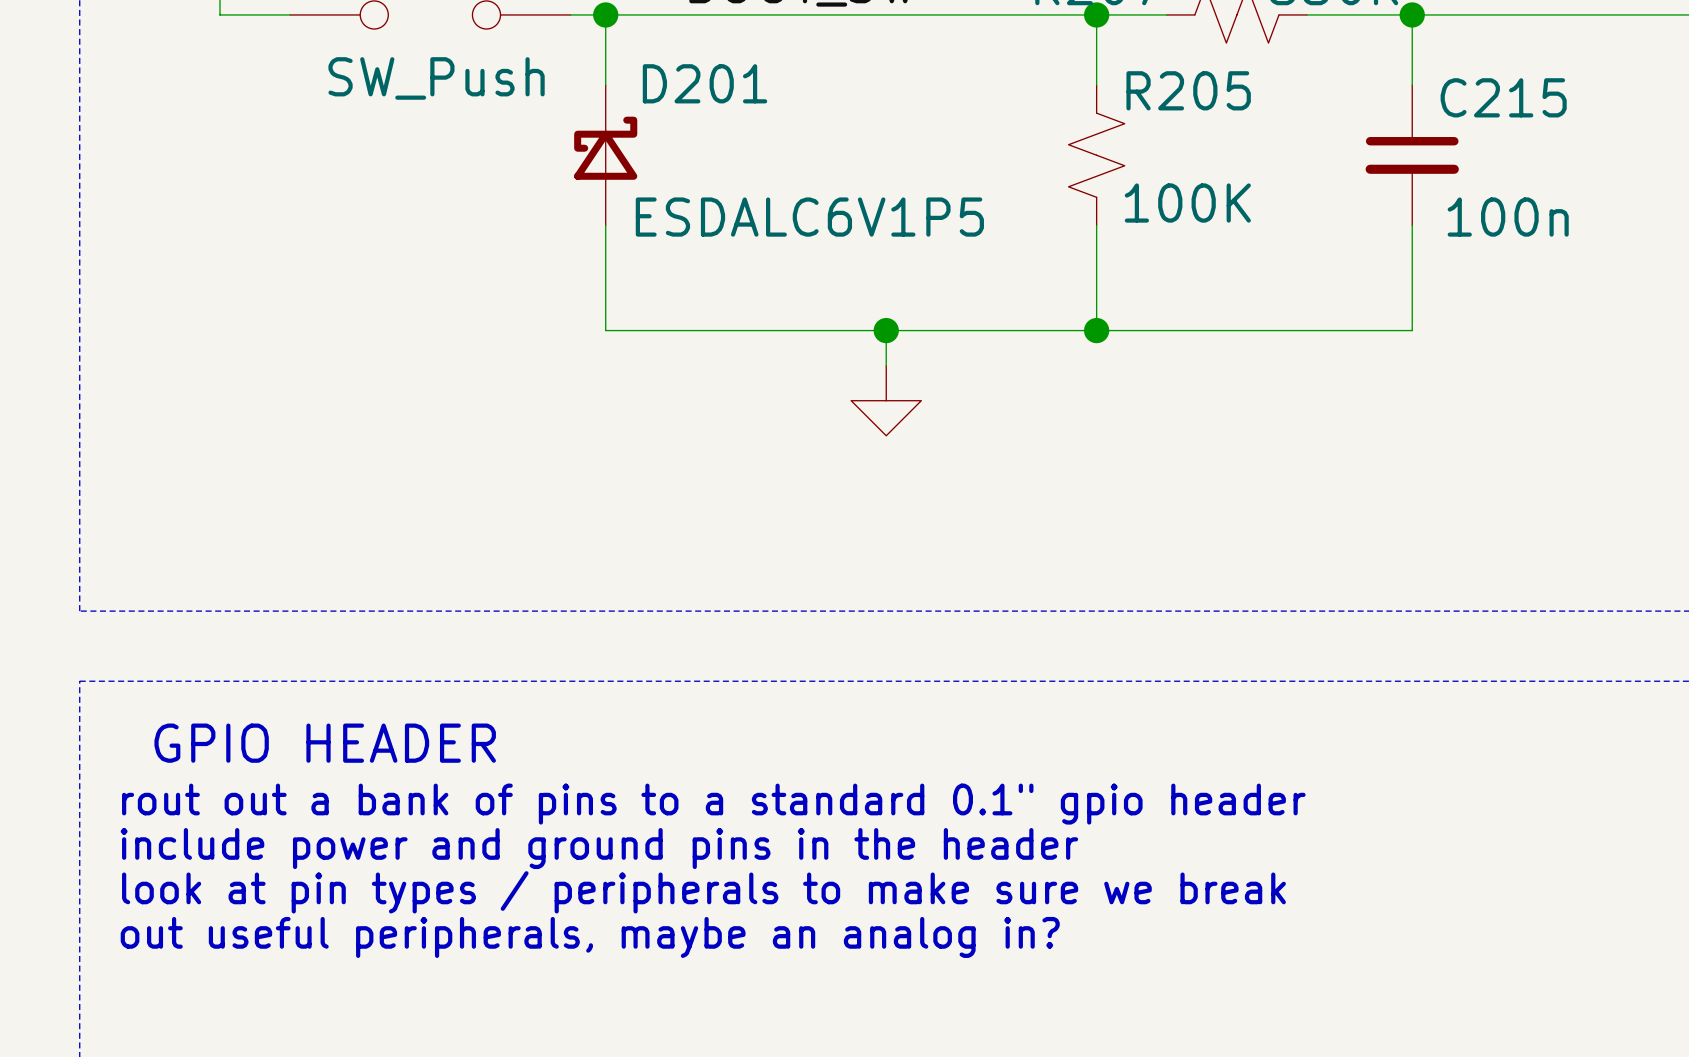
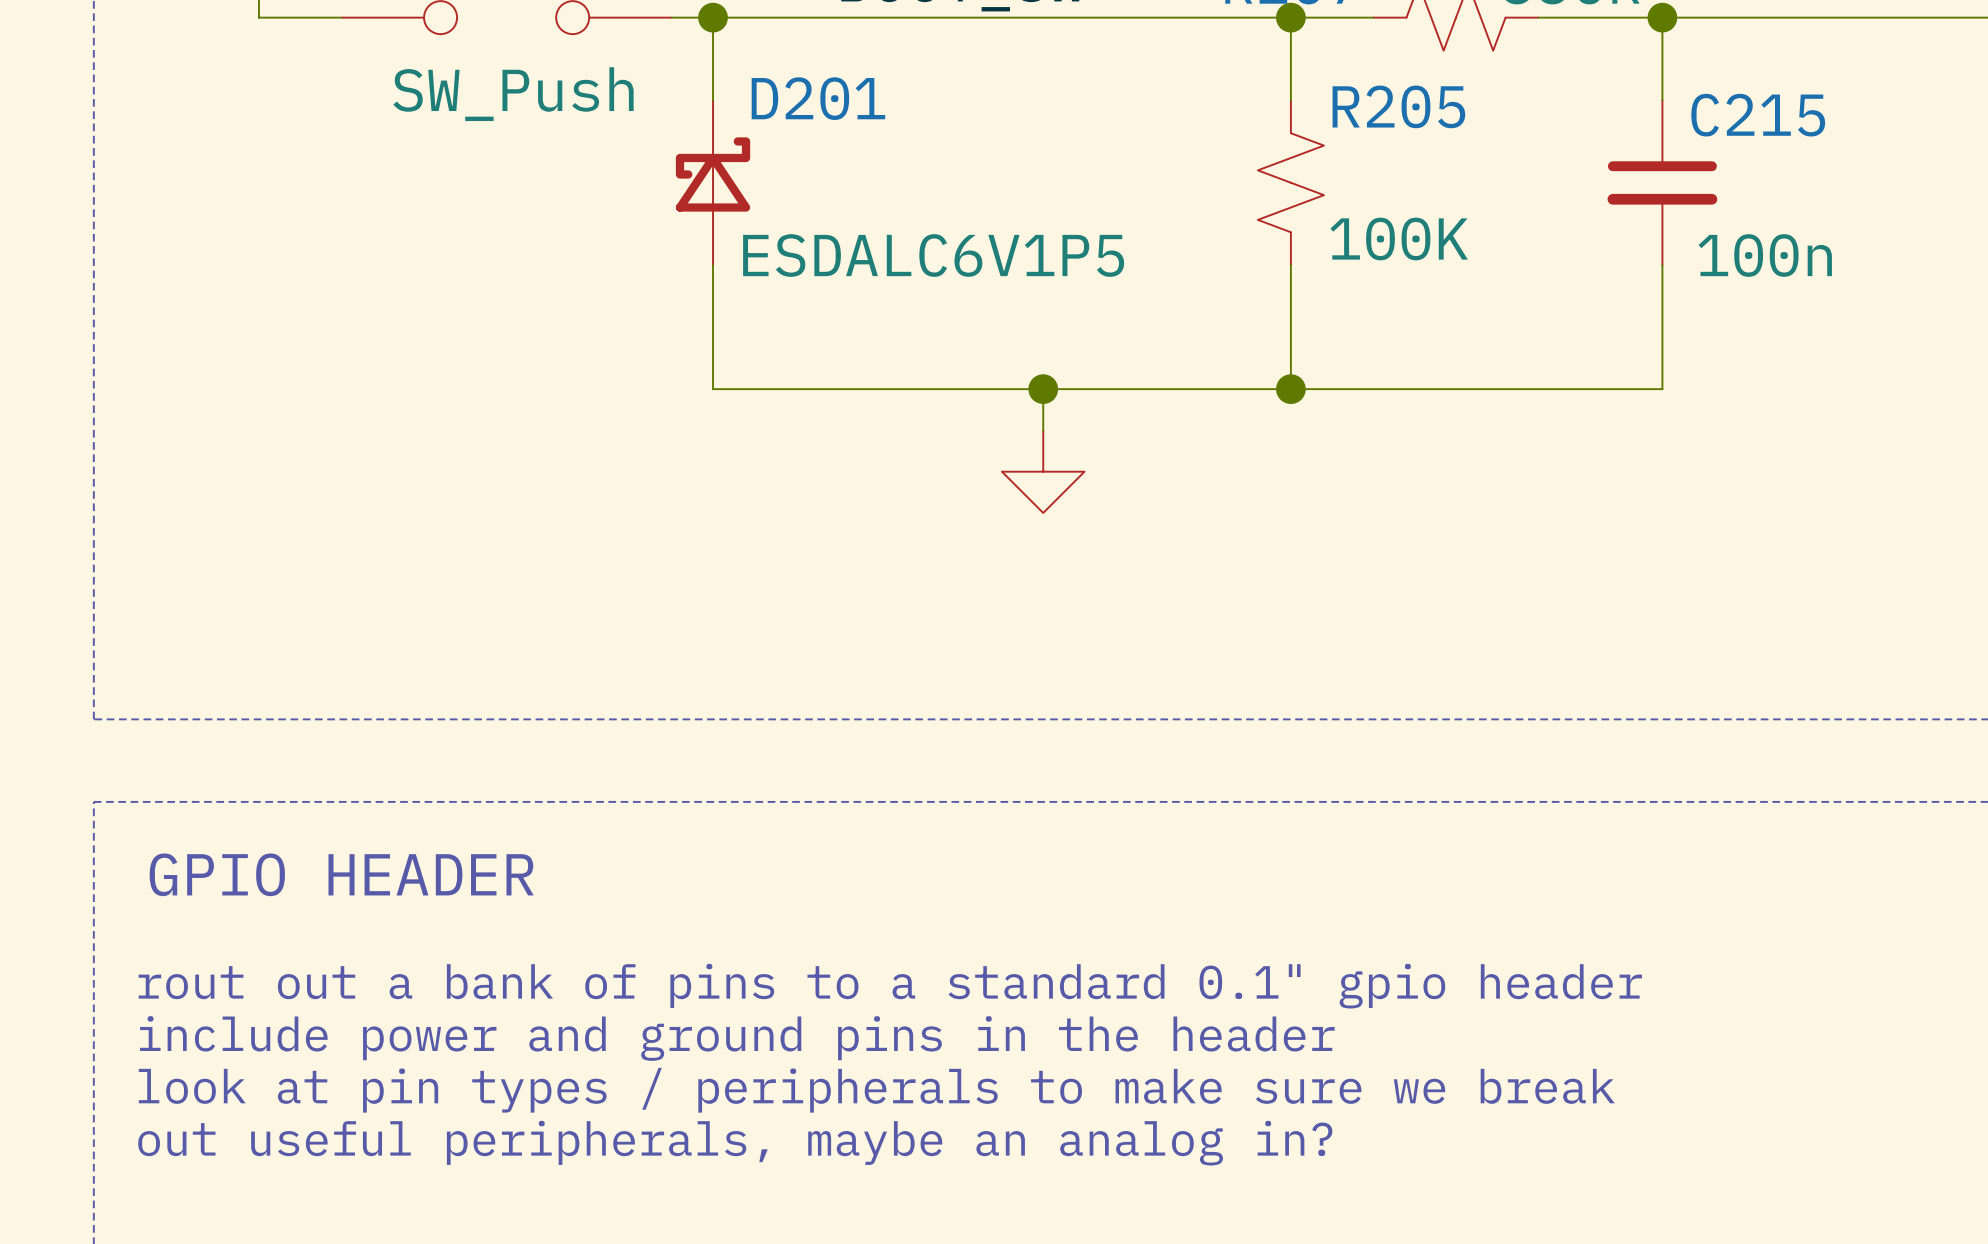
text position: GPIO HEADER (325, 743) -> GPIO HEADER (341, 874)
text: rout out a bank of pins to a standard 0.1" gpio header (713, 804) -> none
text: include power and ground pins in the header (599, 848) -> rout out a bank of pins to a standard 0.1" gpio header (890, 986)
text: look at pin types / peripherals to make sure we break (703, 892) -> include power and ground pins in the header (737, 1038)
text: out useful peripherals, maybe an analog in? (590, 937) -> look at pin types / peripherals to make sure we break (876, 1090)
text: none -> out useful peripherals, maybe an analog in? (735, 1143)

